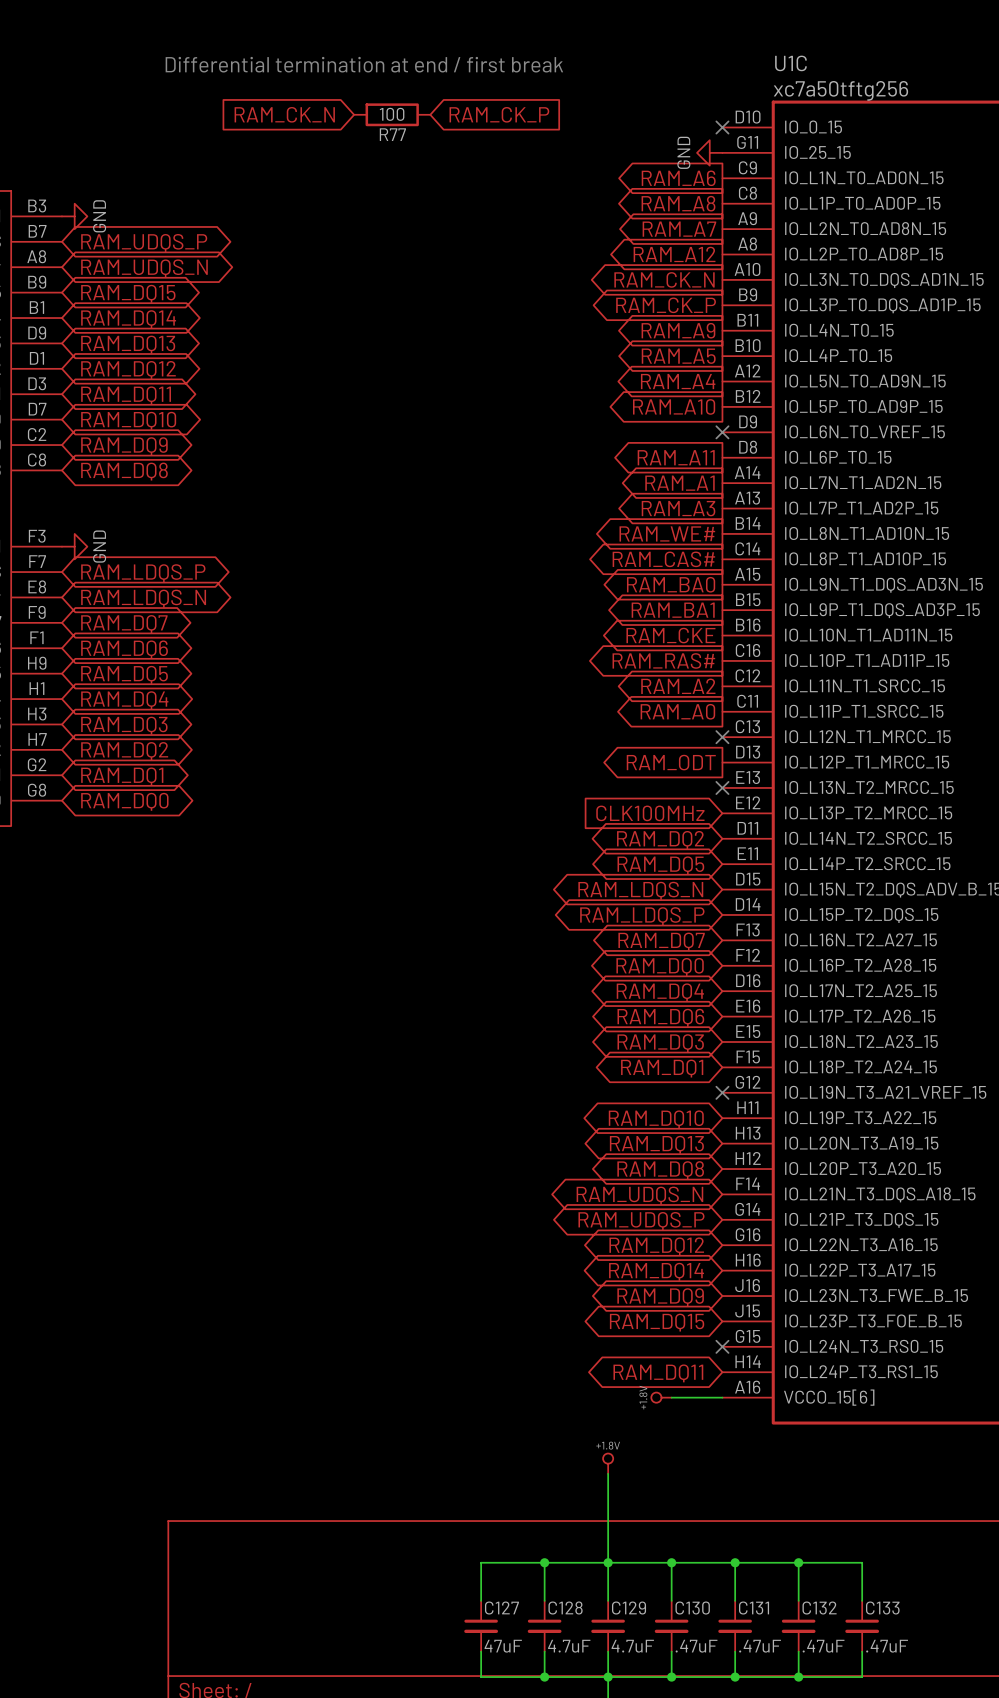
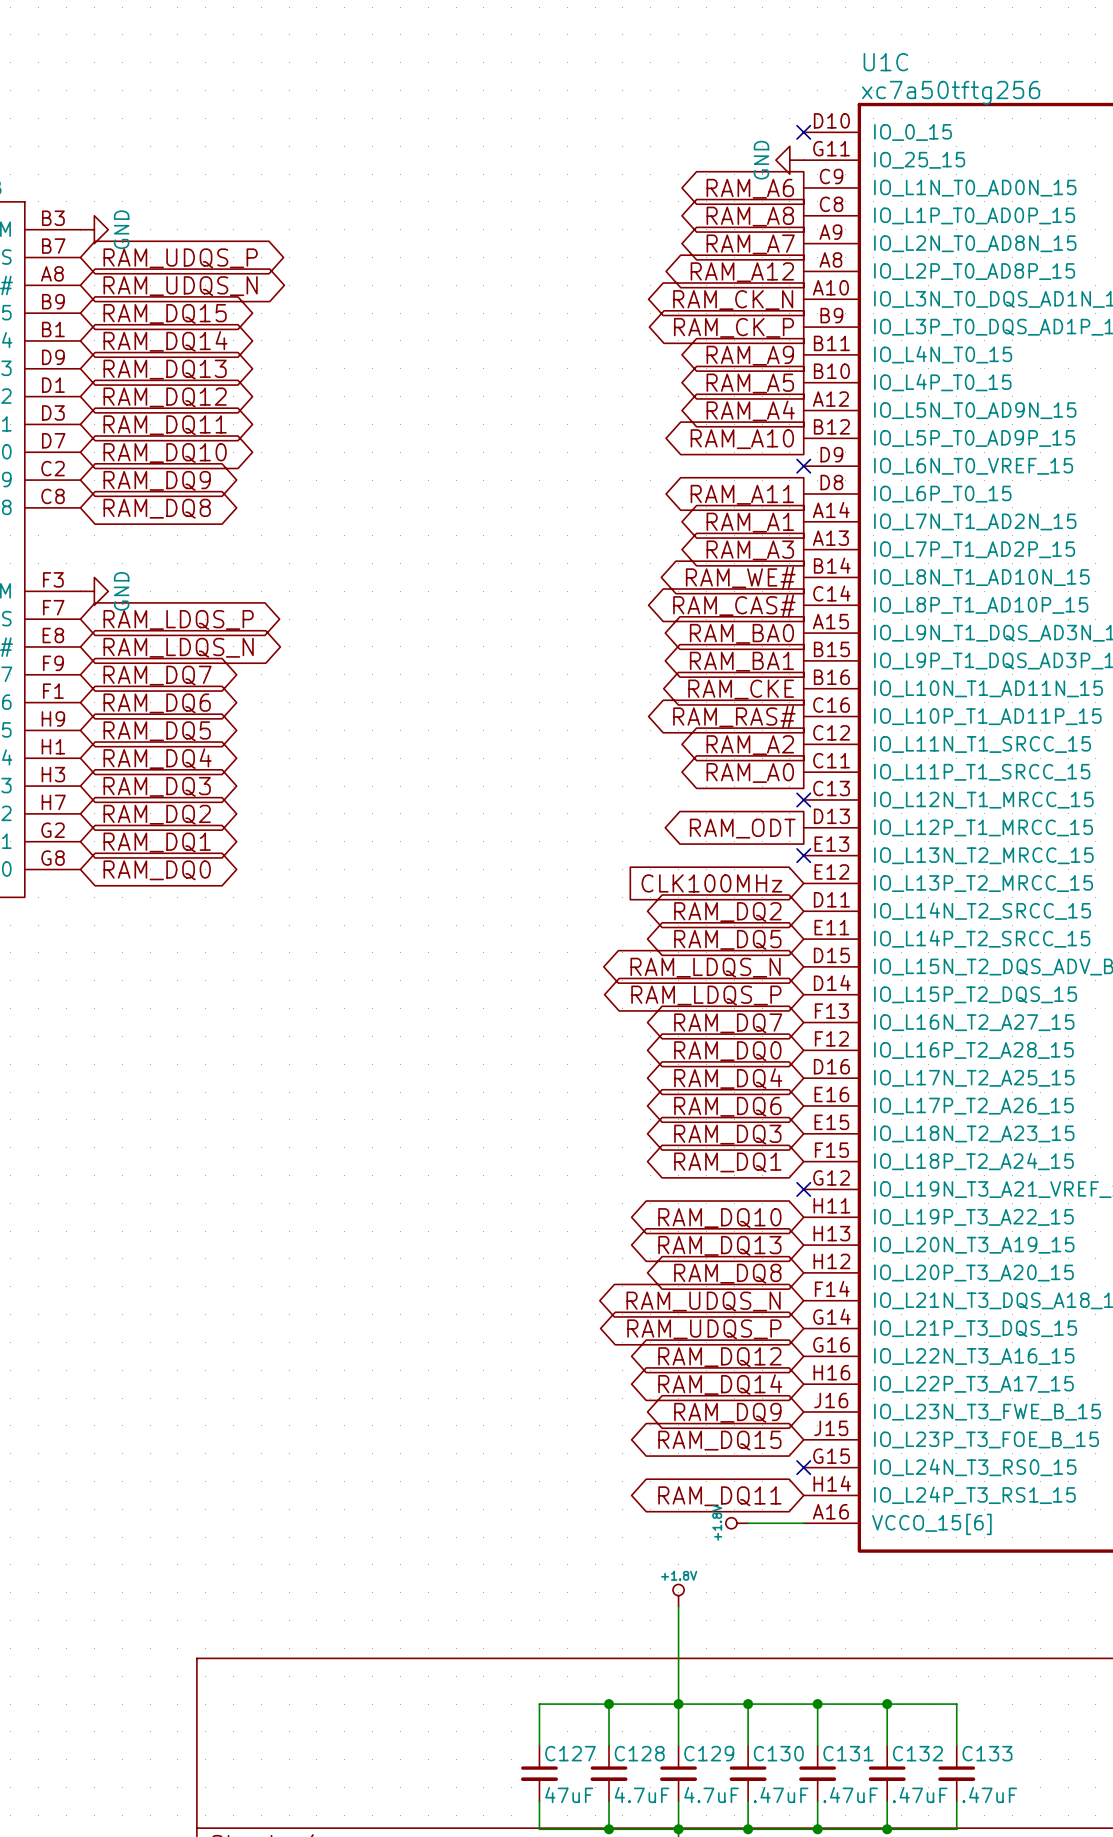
text: Differential termination at end / first break (364, 64) -> none
global label: RAM_CK_N (284, 114) -> none
R77: 100 (392, 114) -> none
global label: RAM_CK_P (499, 114) -> none

